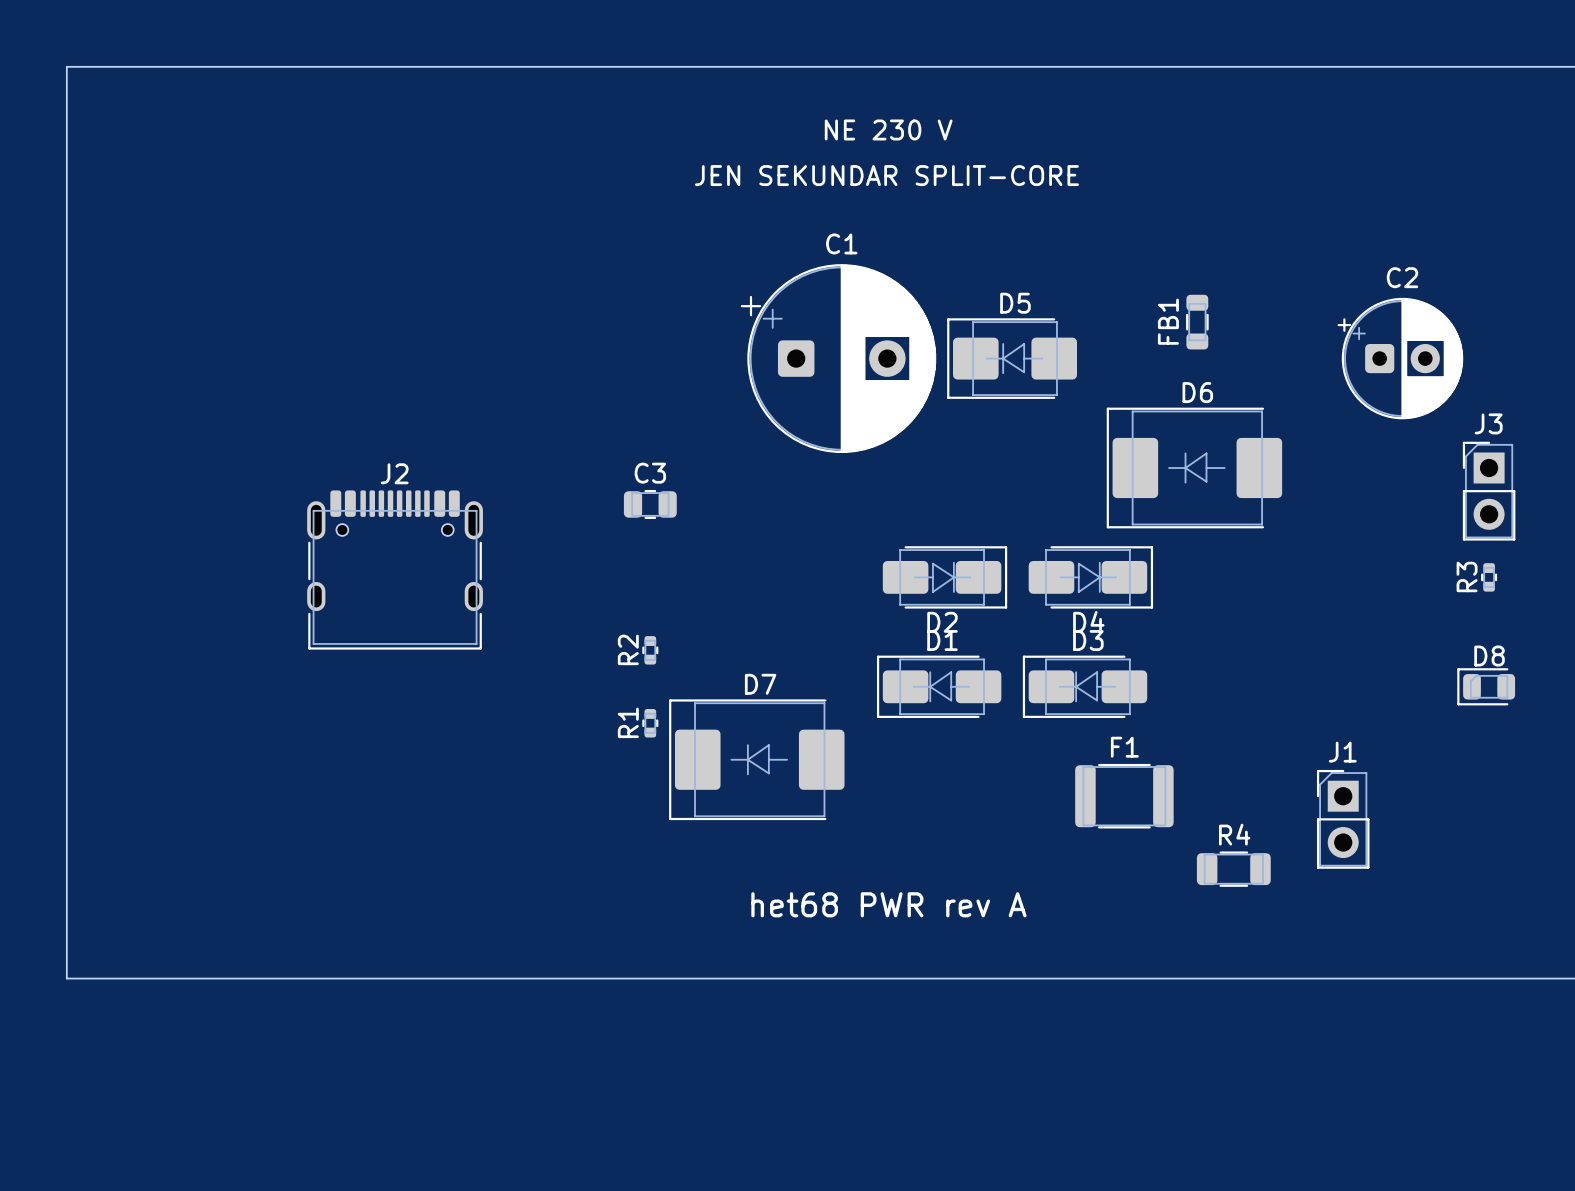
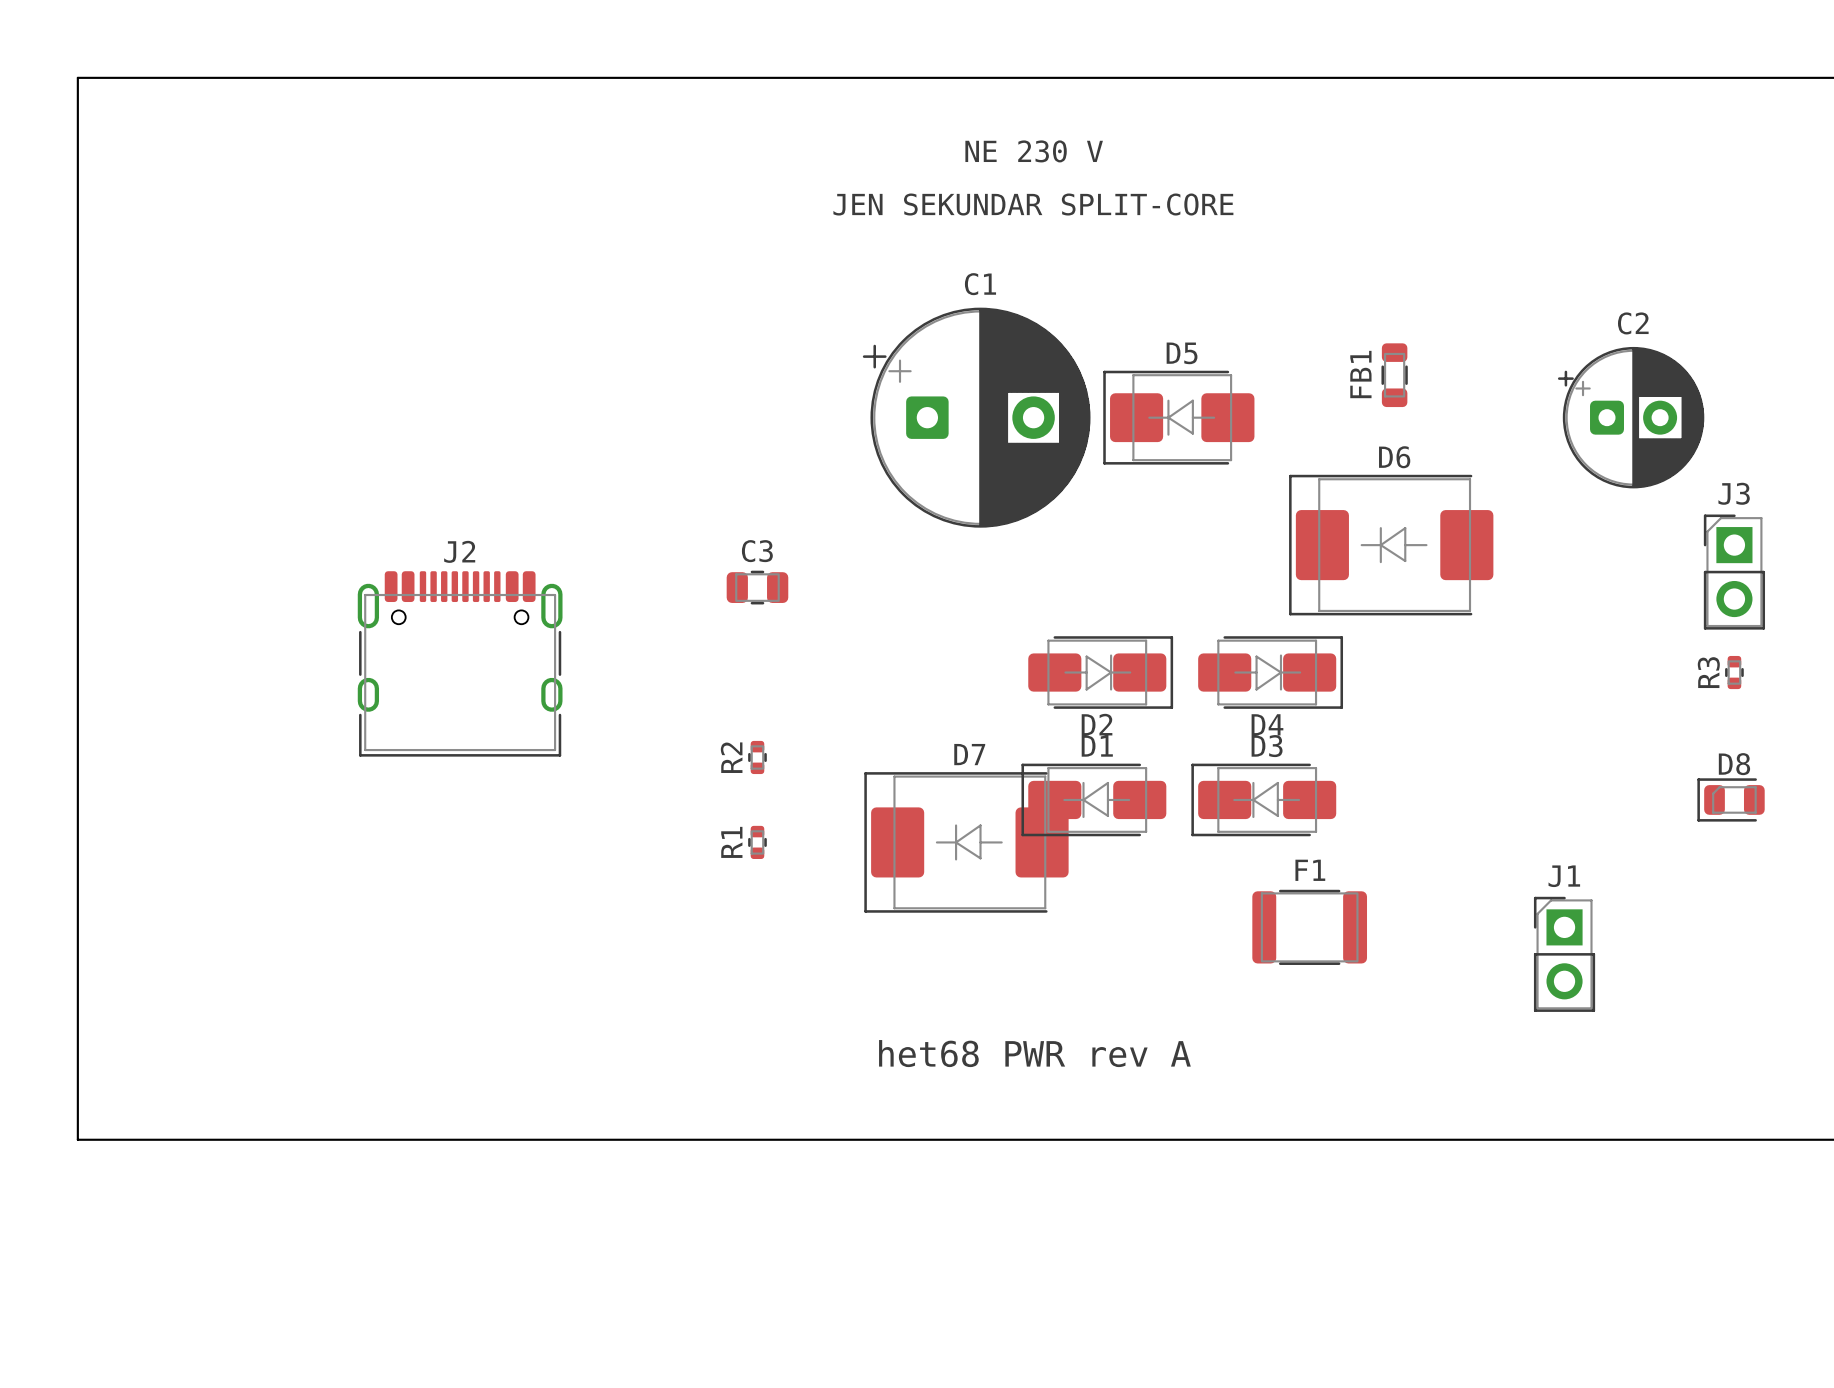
D7 position: (756, 759) -> (966, 842)
R4: (1233, 869) -> none

